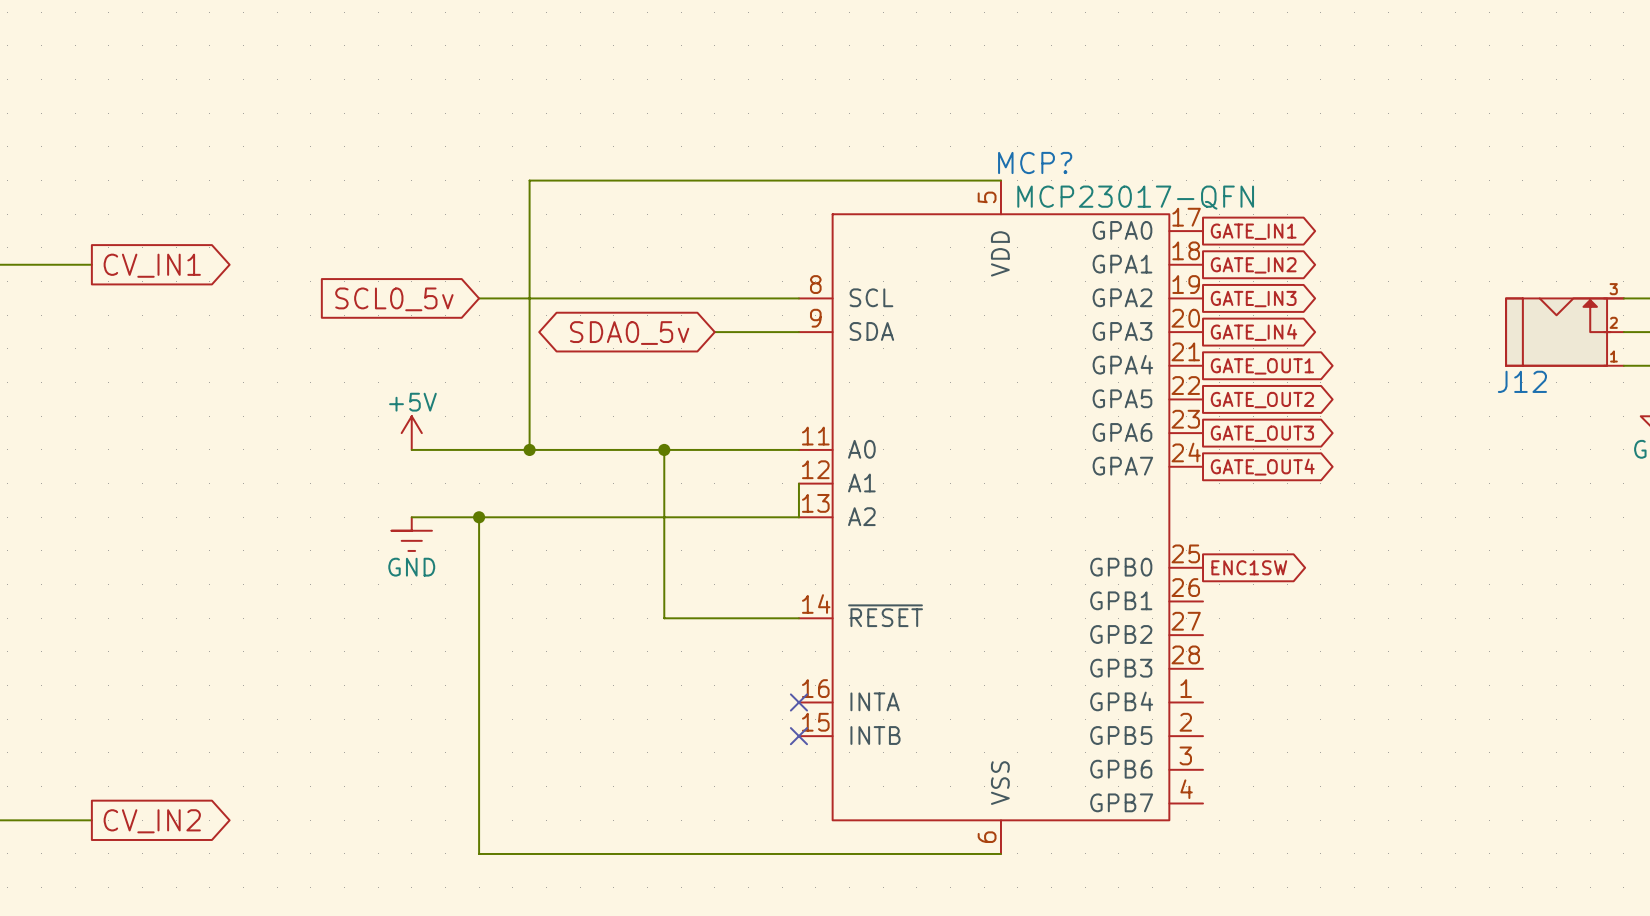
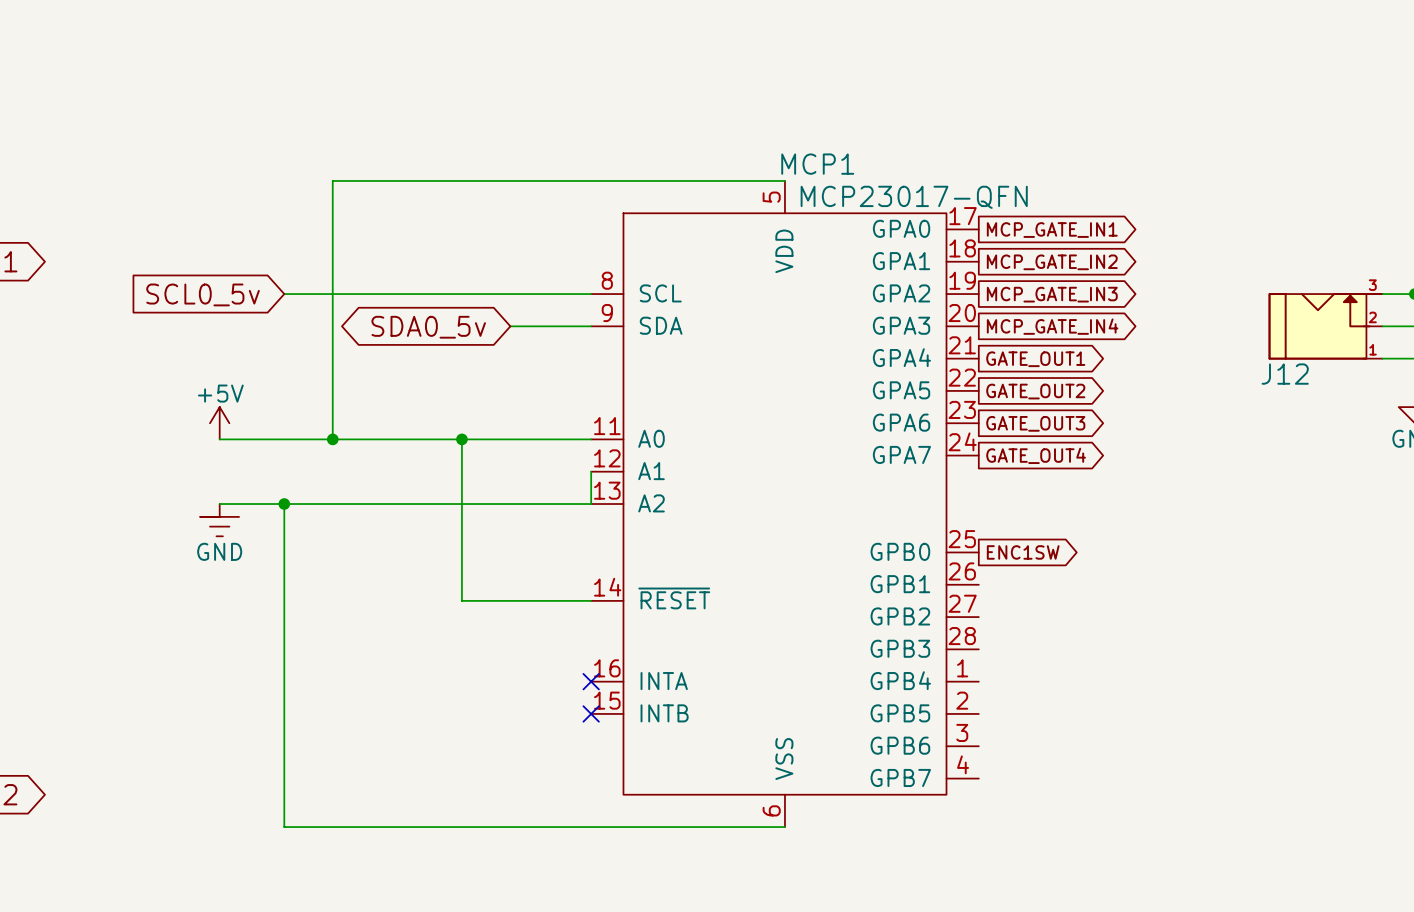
MCP? name: MCP? (1035, 162) -> MCP1 (817, 164)
global label: GATE_IN1 (1253, 231) -> MCP_GATE_IN1 (1052, 230)
global label: GATE_IN2 (1253, 265) -> MCP_GATE_IN2 (1052, 262)
global label: GATE_IN3 (1253, 299) -> MCP_GATE_IN3 (1052, 294)
global label: GATE_IN4 (1253, 332) -> MCP_GATE_IN4 (1052, 326)

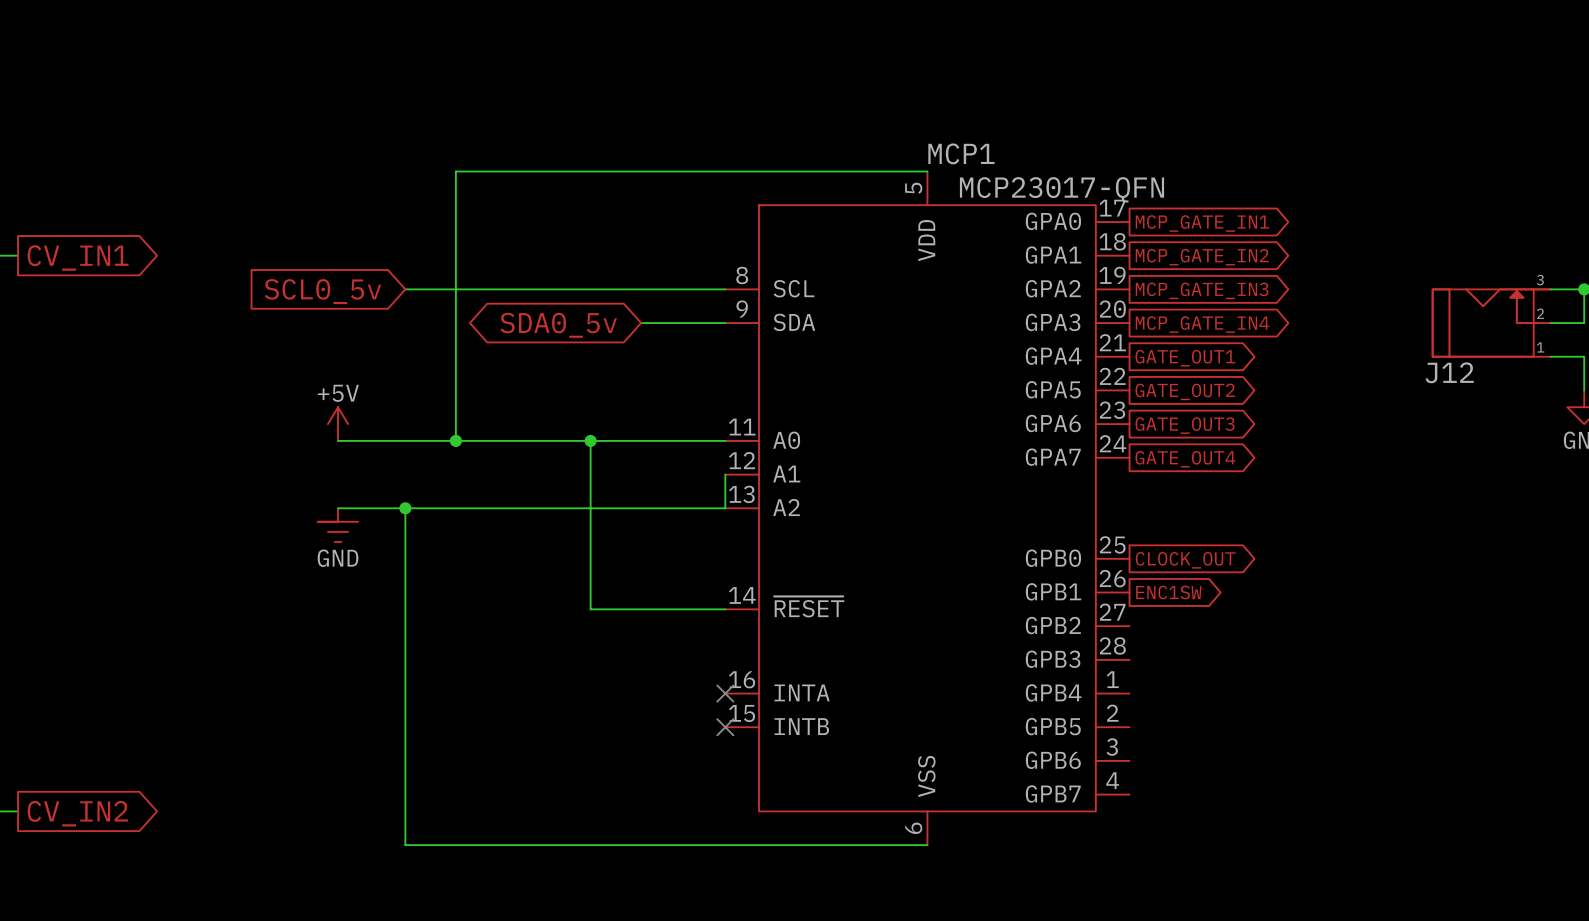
global label: ENC1SW (1023, 552) -> CLOCK_OUT (1185, 560)
global label: none -> ENC1SW (1168, 592)

